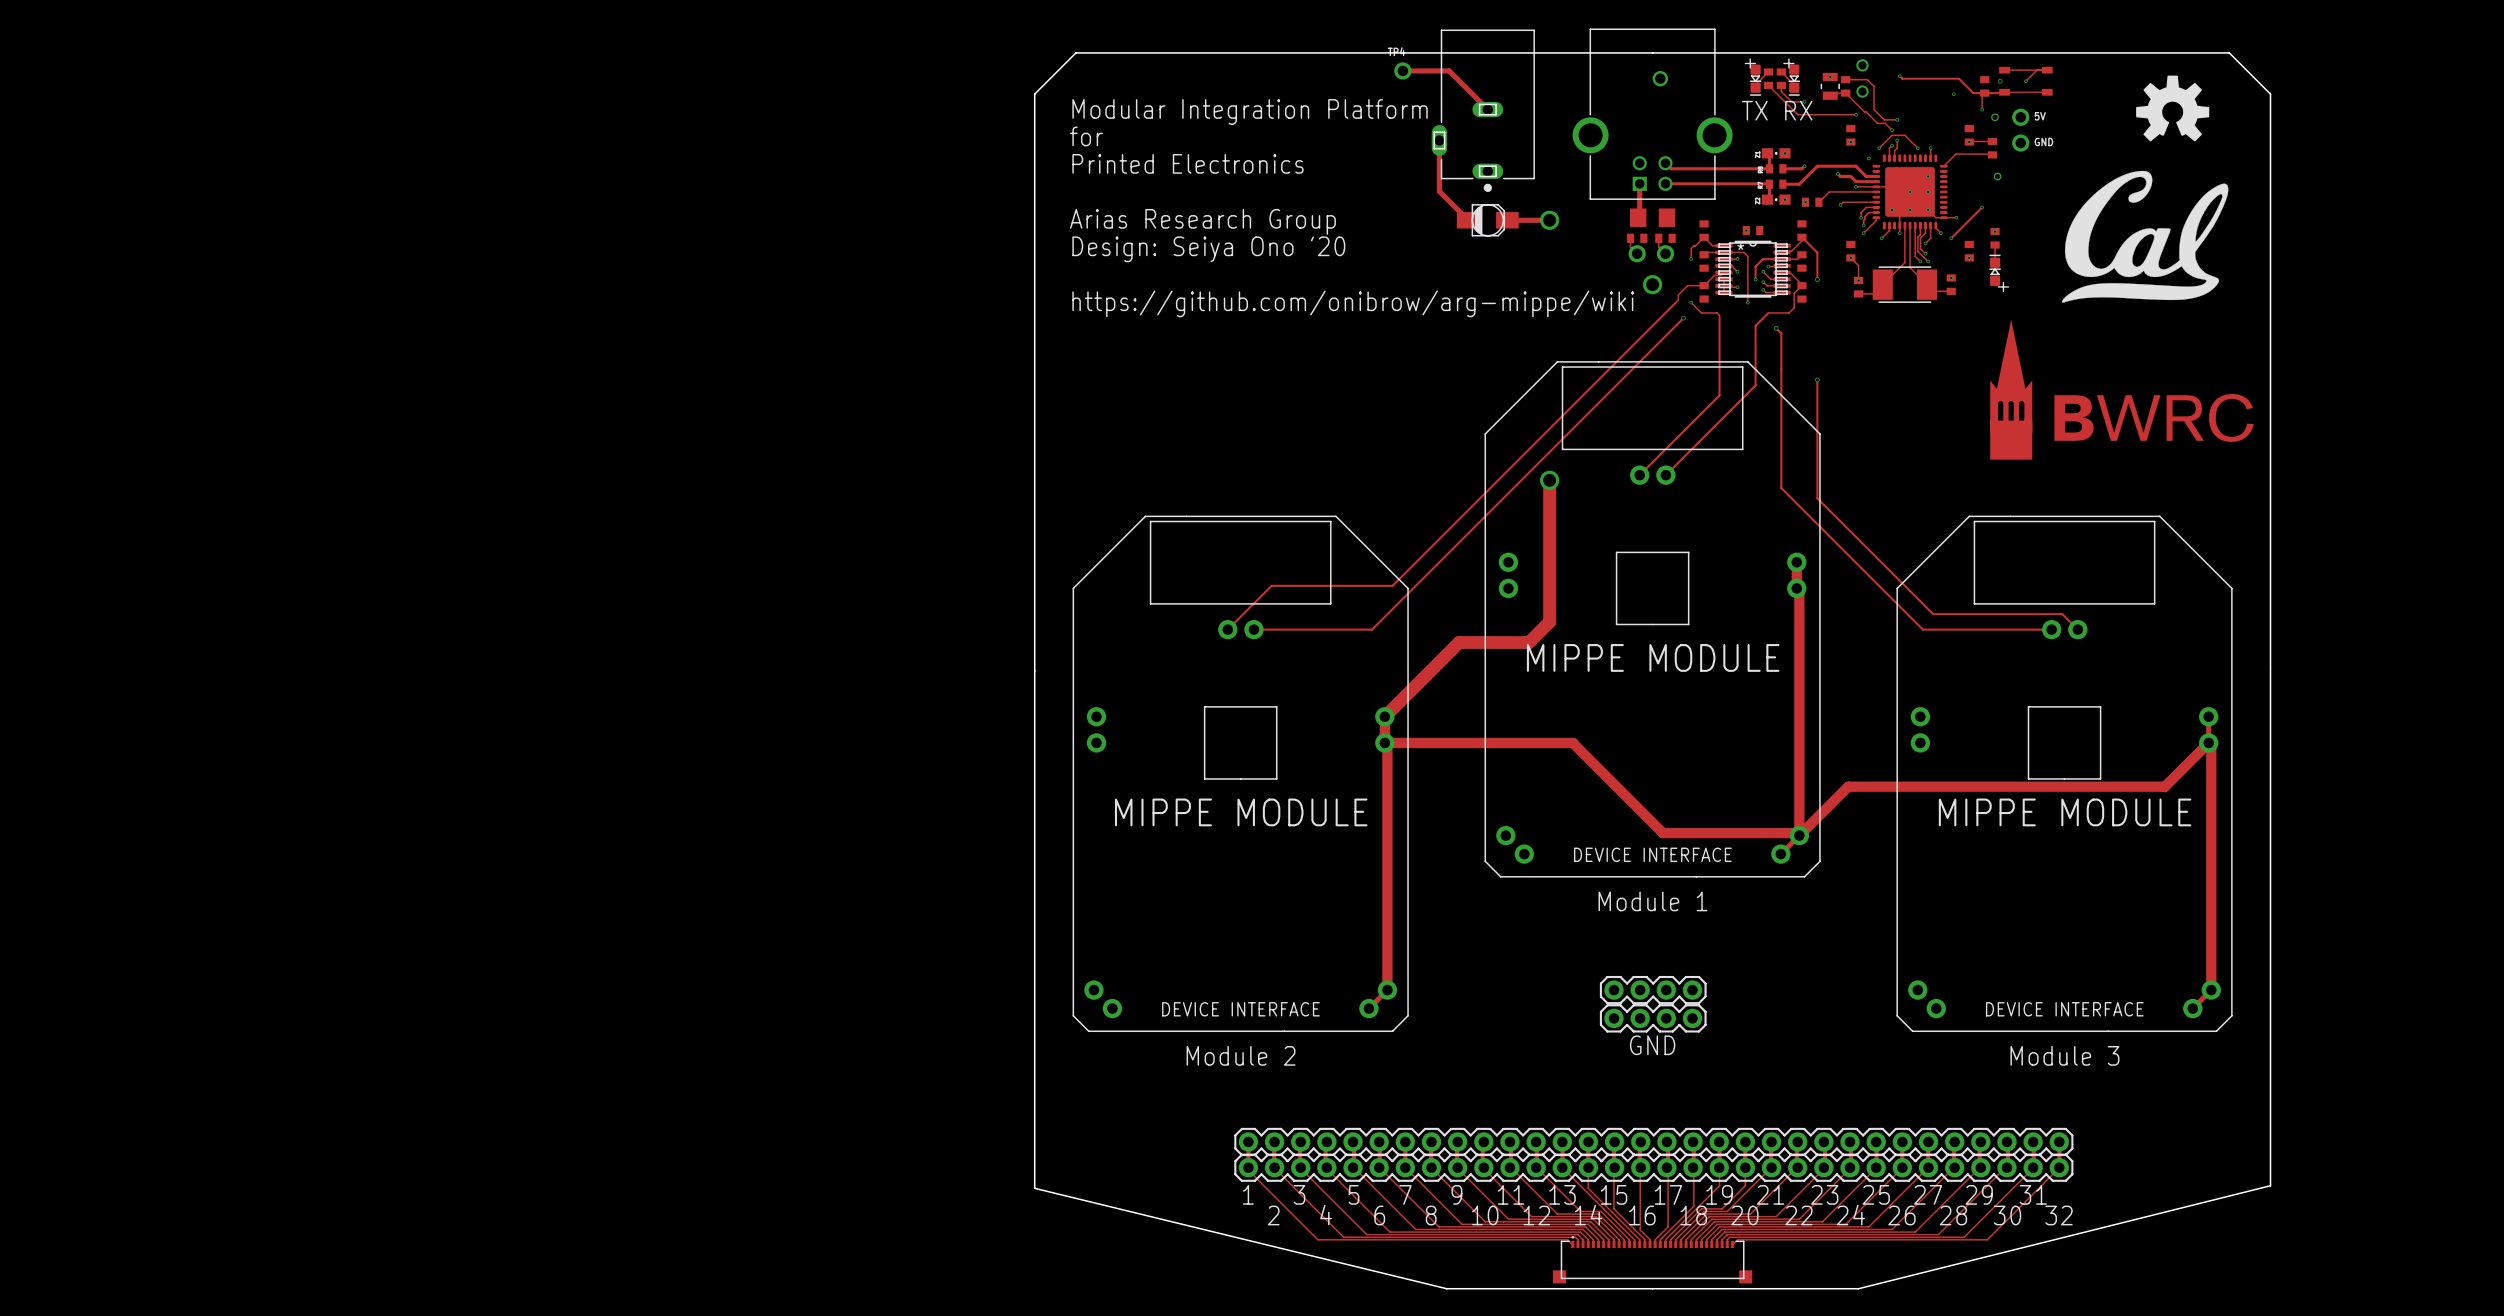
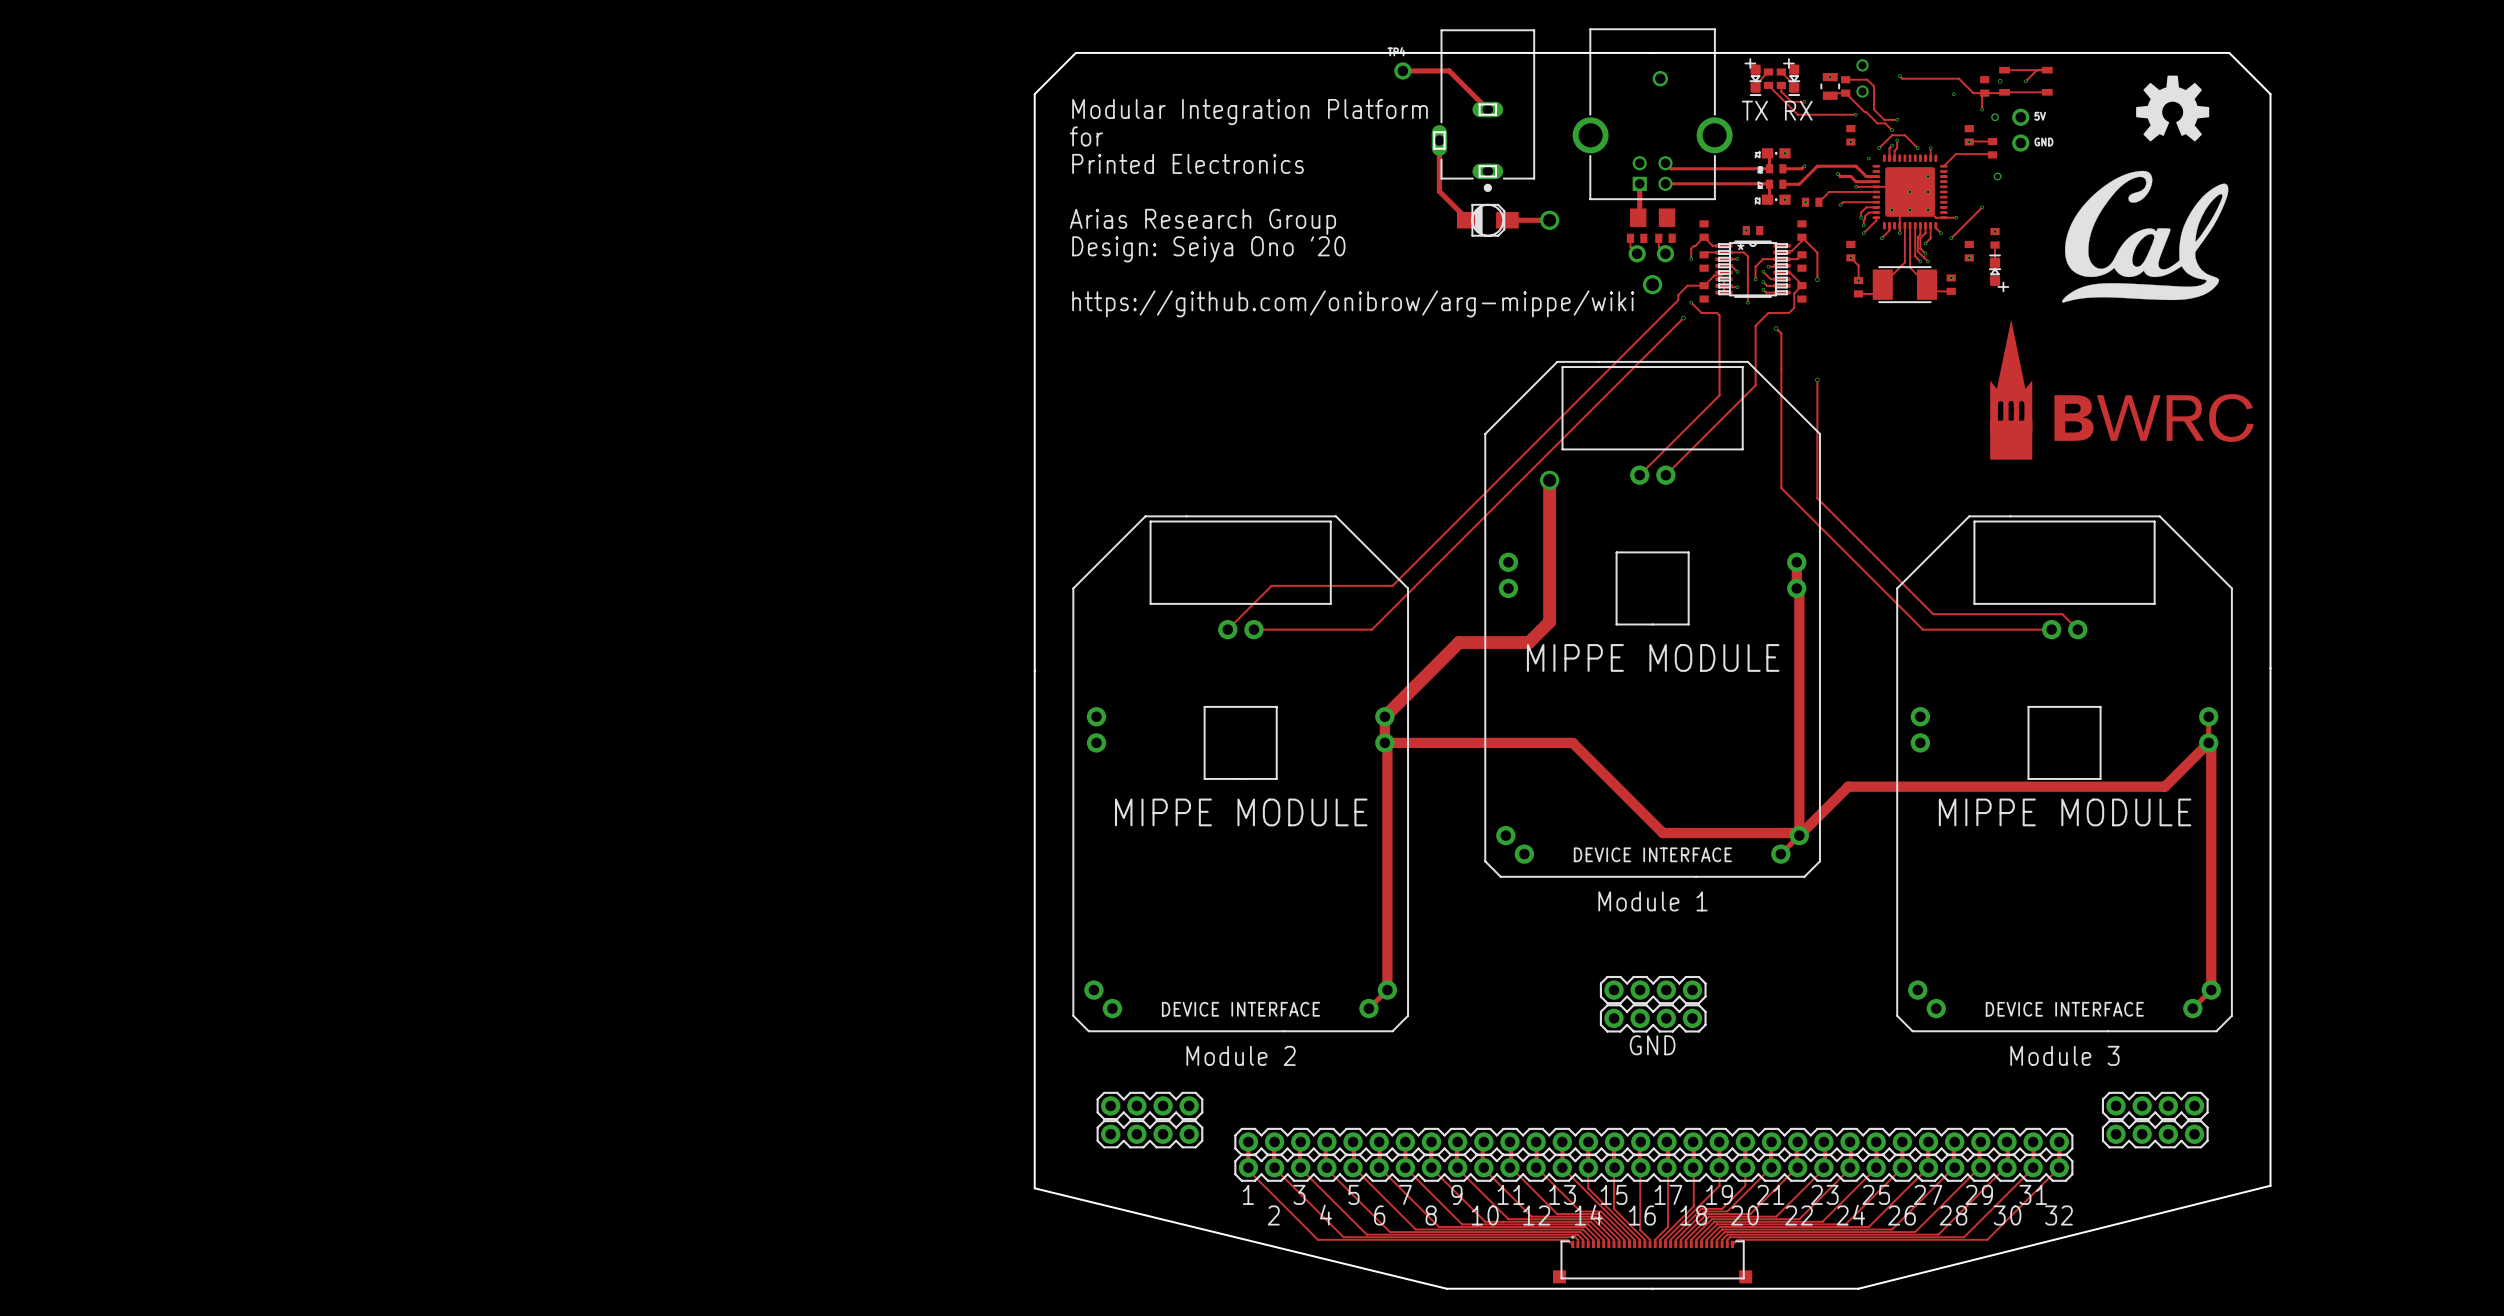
part: none -> (1149, 1105)
part: none -> (2155, 1105)
part: none -> (1149, 1134)
part: none -> (2155, 1134)

